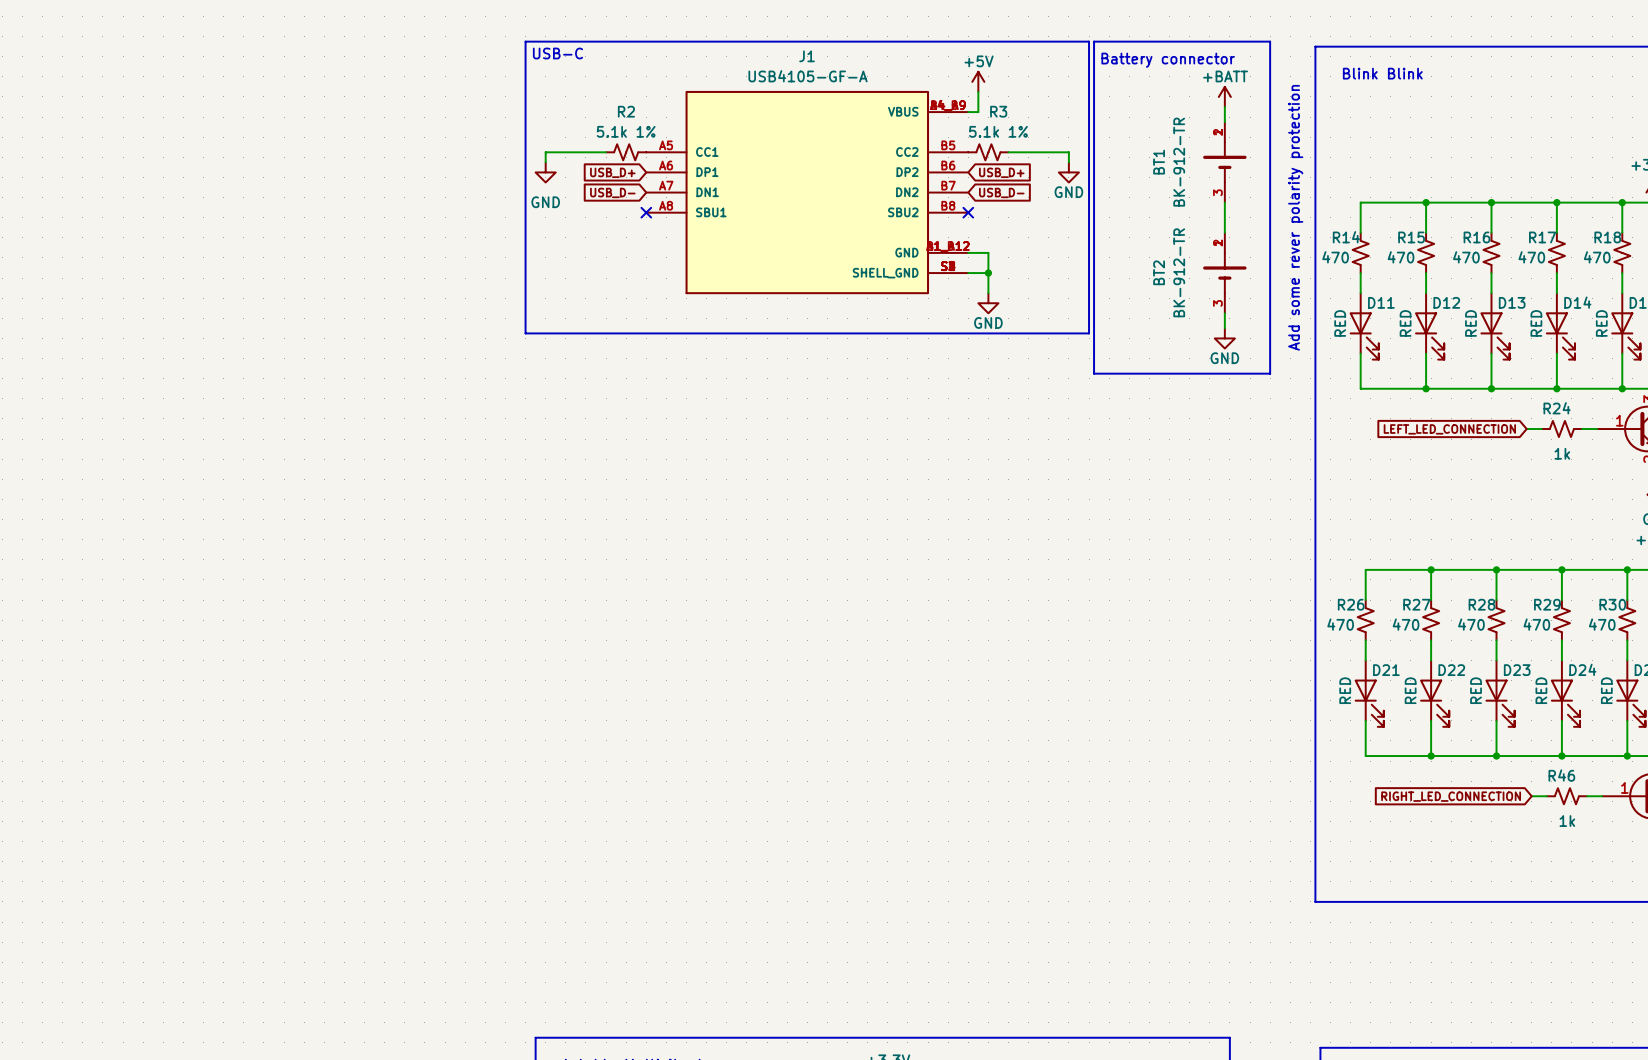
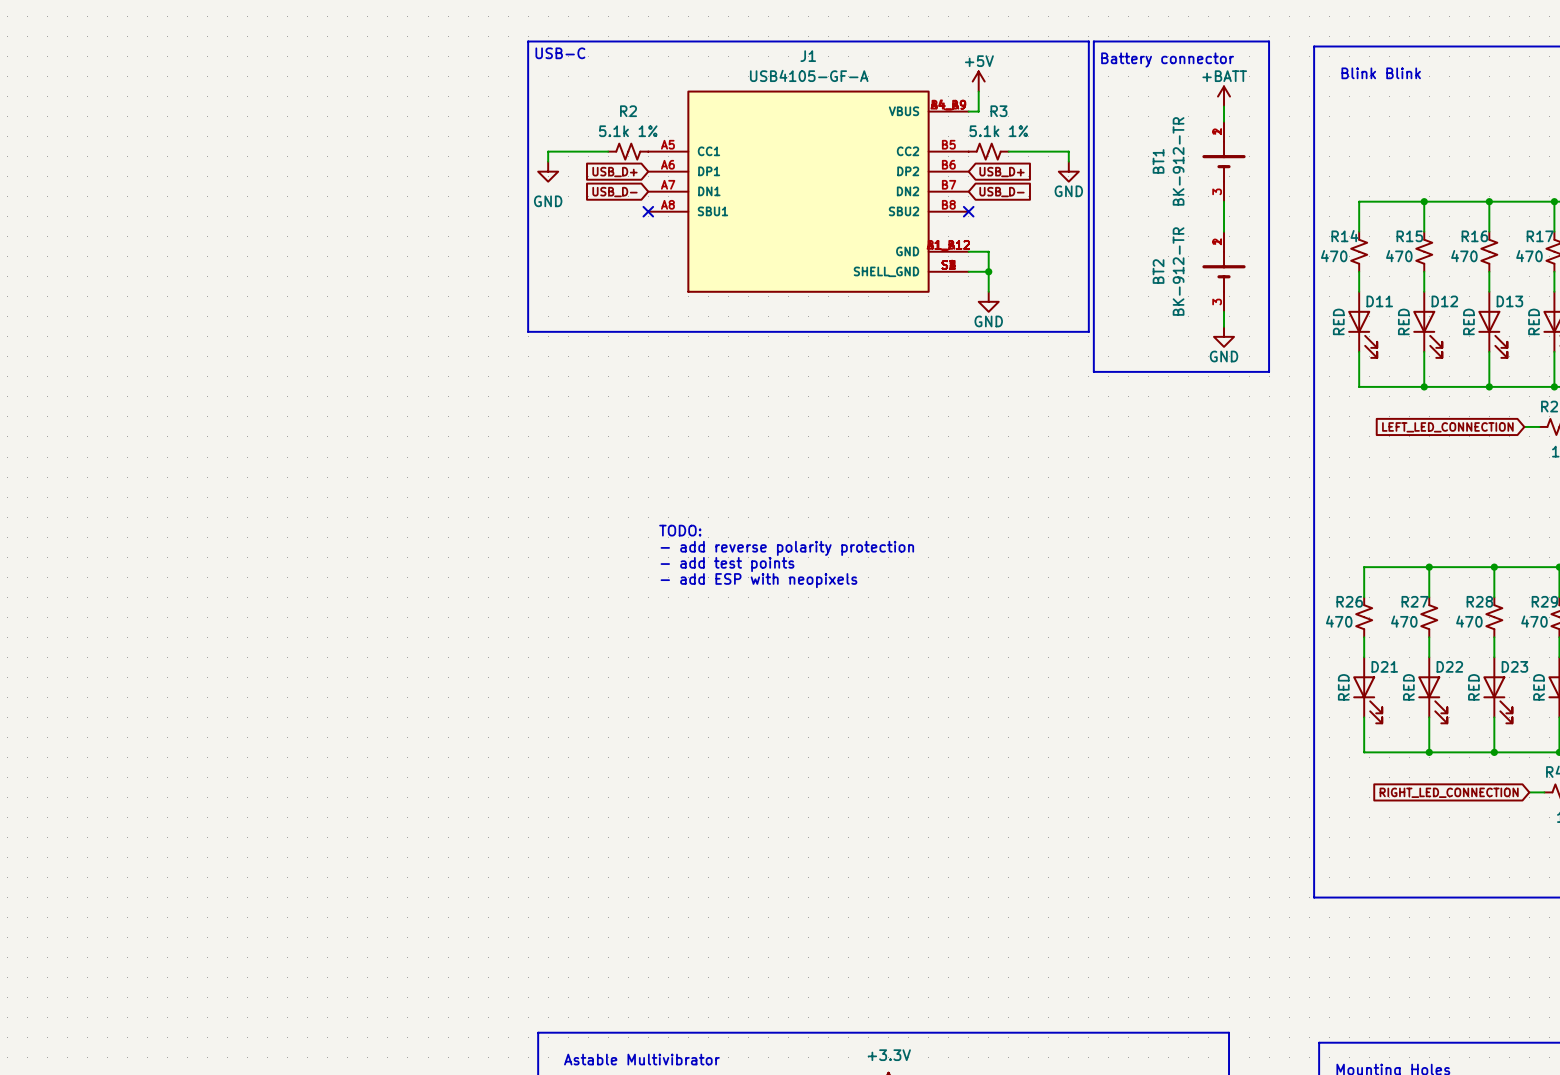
text: Add some rever polarity protection (1295, 217) -> none
text: none -> TODO: (680, 530)
text: none -> - add reverse polarity protection (787, 548)
text: none -> - add test points (727, 564)
text: none -> - add ESP with neopixels (758, 580)

